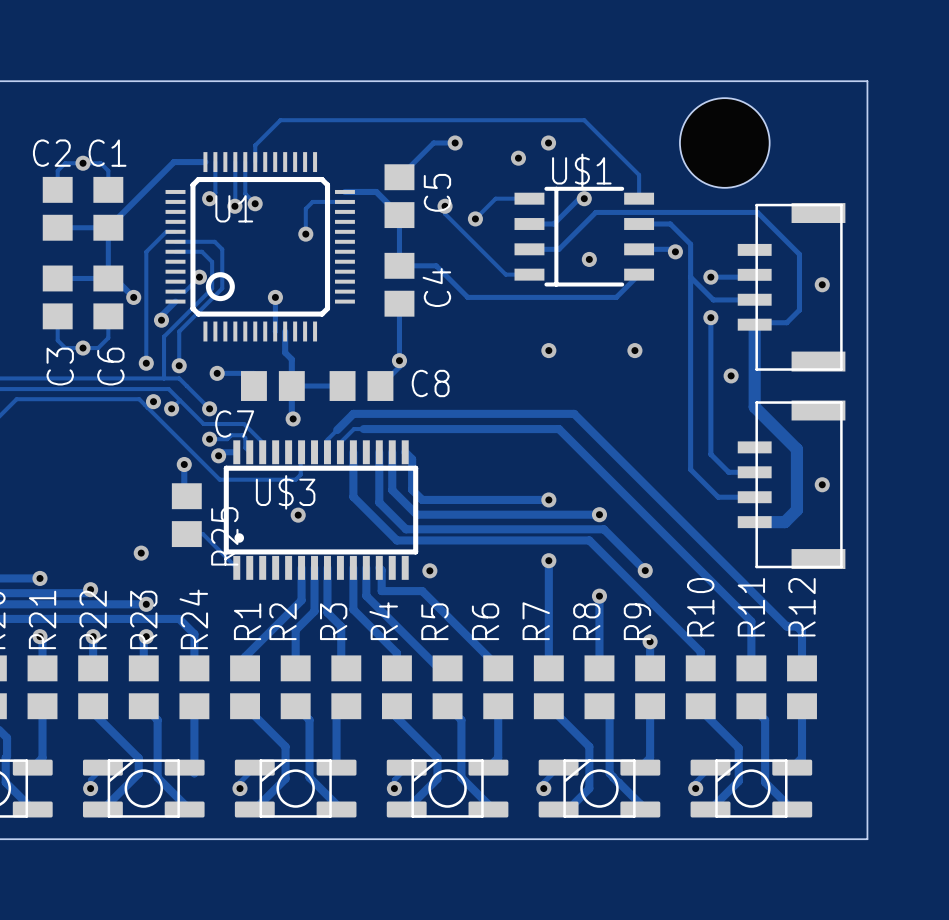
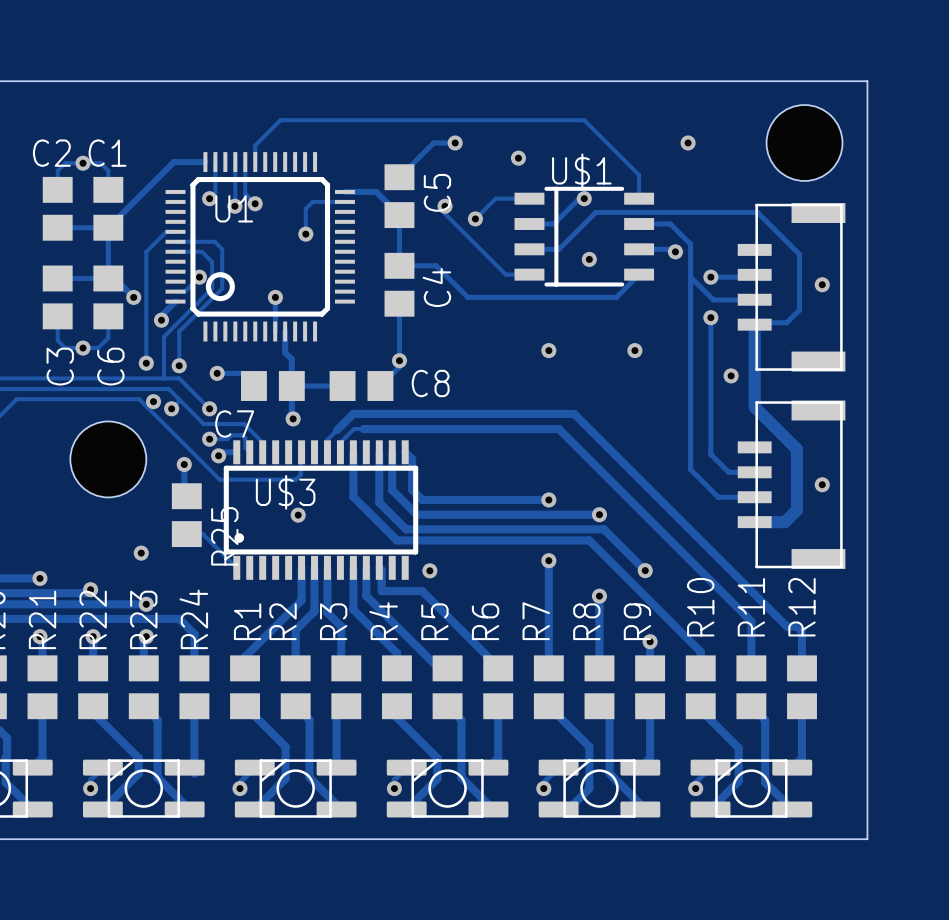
via: (548, 142) -> none
via: none -> (688, 142)
hole: (724, 142) -> none
hole: none -> (804, 142)
hole: none -> (108, 459)

